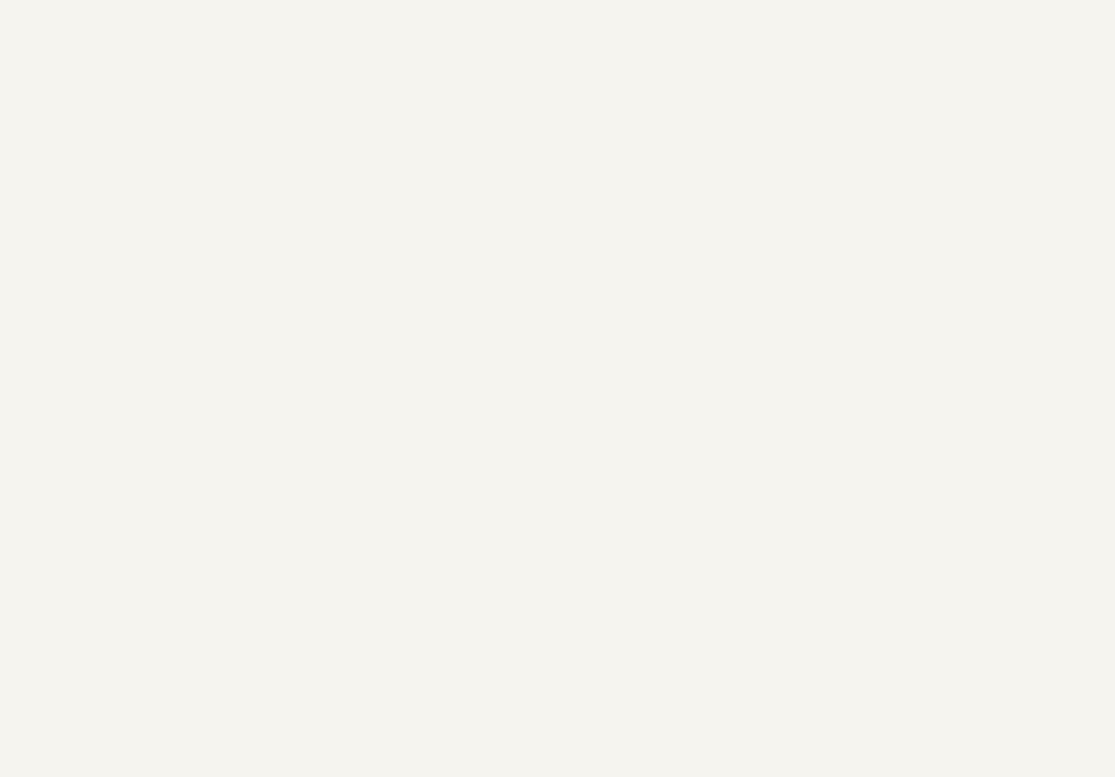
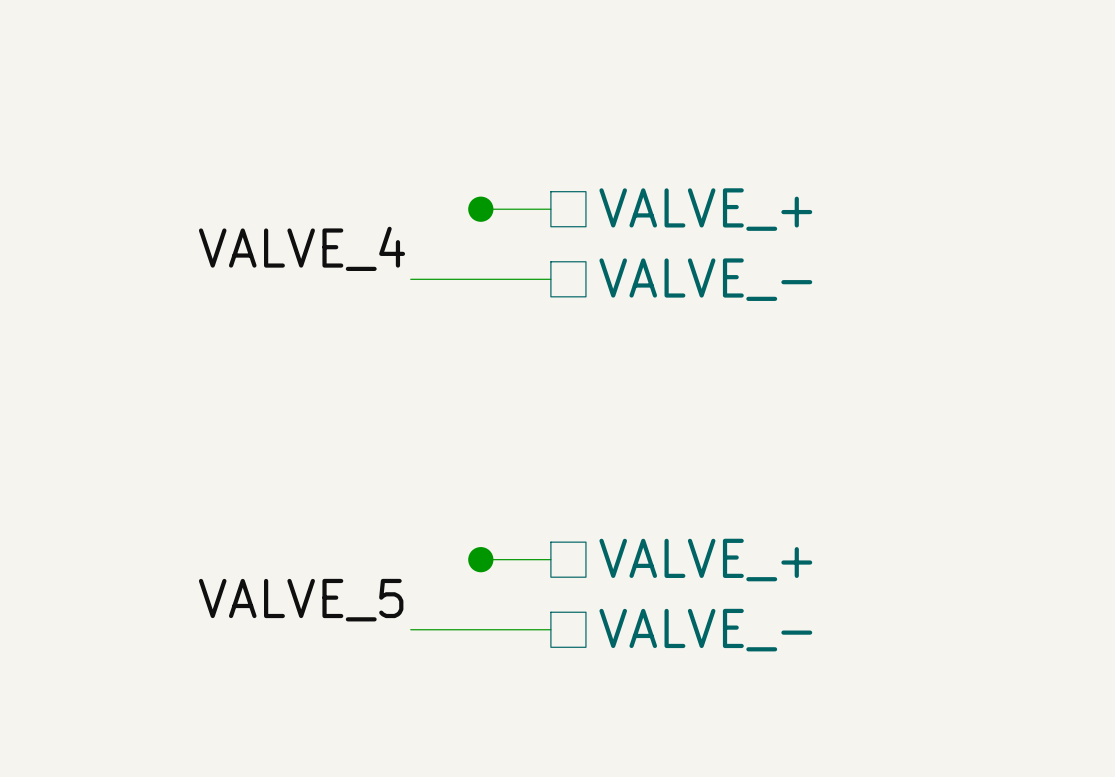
wire: none -> (480, 209) (550, 209)
junction: none -> (480, 209)
sheet pin: none -> VALVE_+ (705, 209)
label: none -> VALVE_4 (301, 248)
wire: none -> (410, 279) (550, 279)
sheet pin: none -> VALVE_- (705, 279)
wire: none -> (480, 559) (550, 559)
junction: none -> (480, 559)
sheet pin: none -> VALVE_+ (705, 560)
label: none -> VALVE_5 (301, 600)
wire: none -> (410, 629) (550, 629)
sheet pin: none -> VALVE_- (705, 630)

